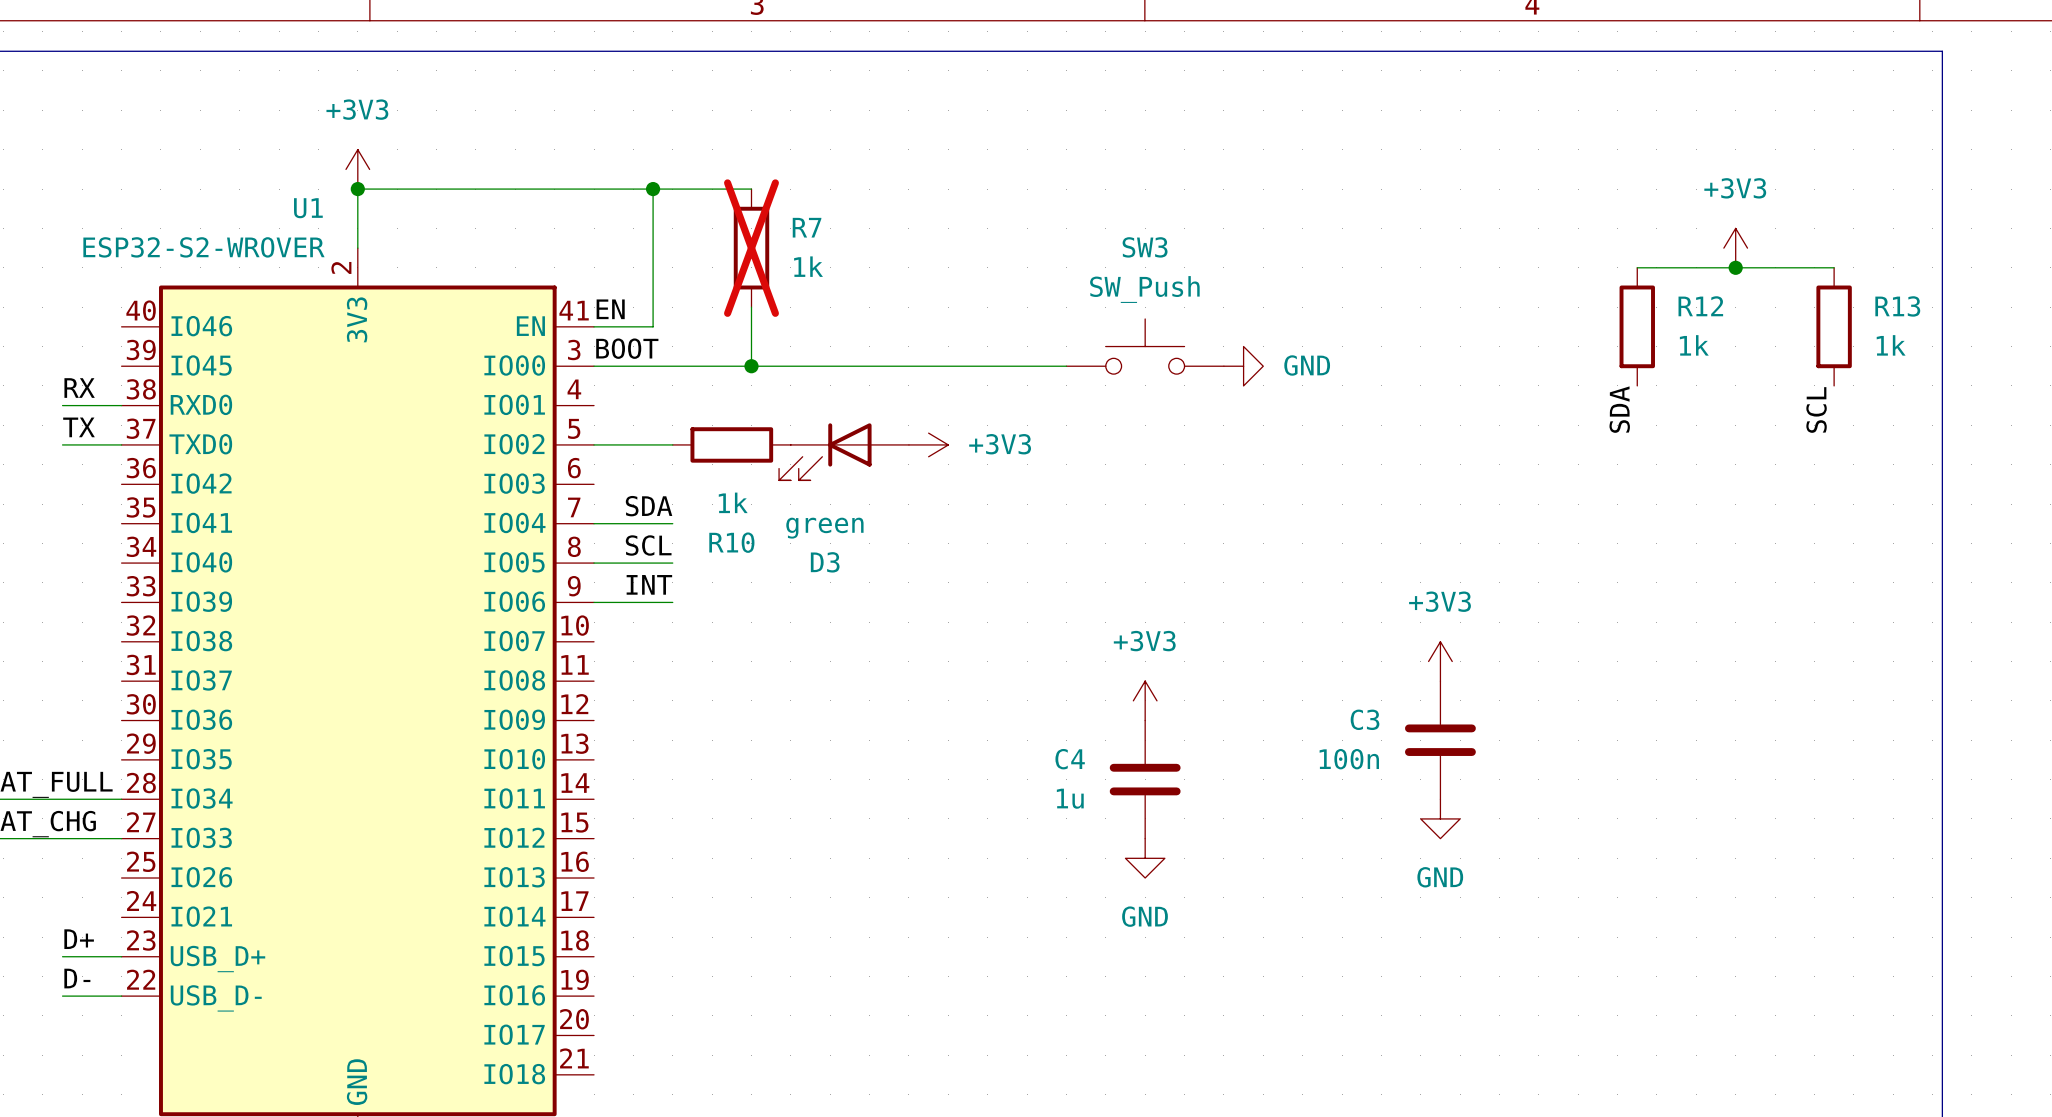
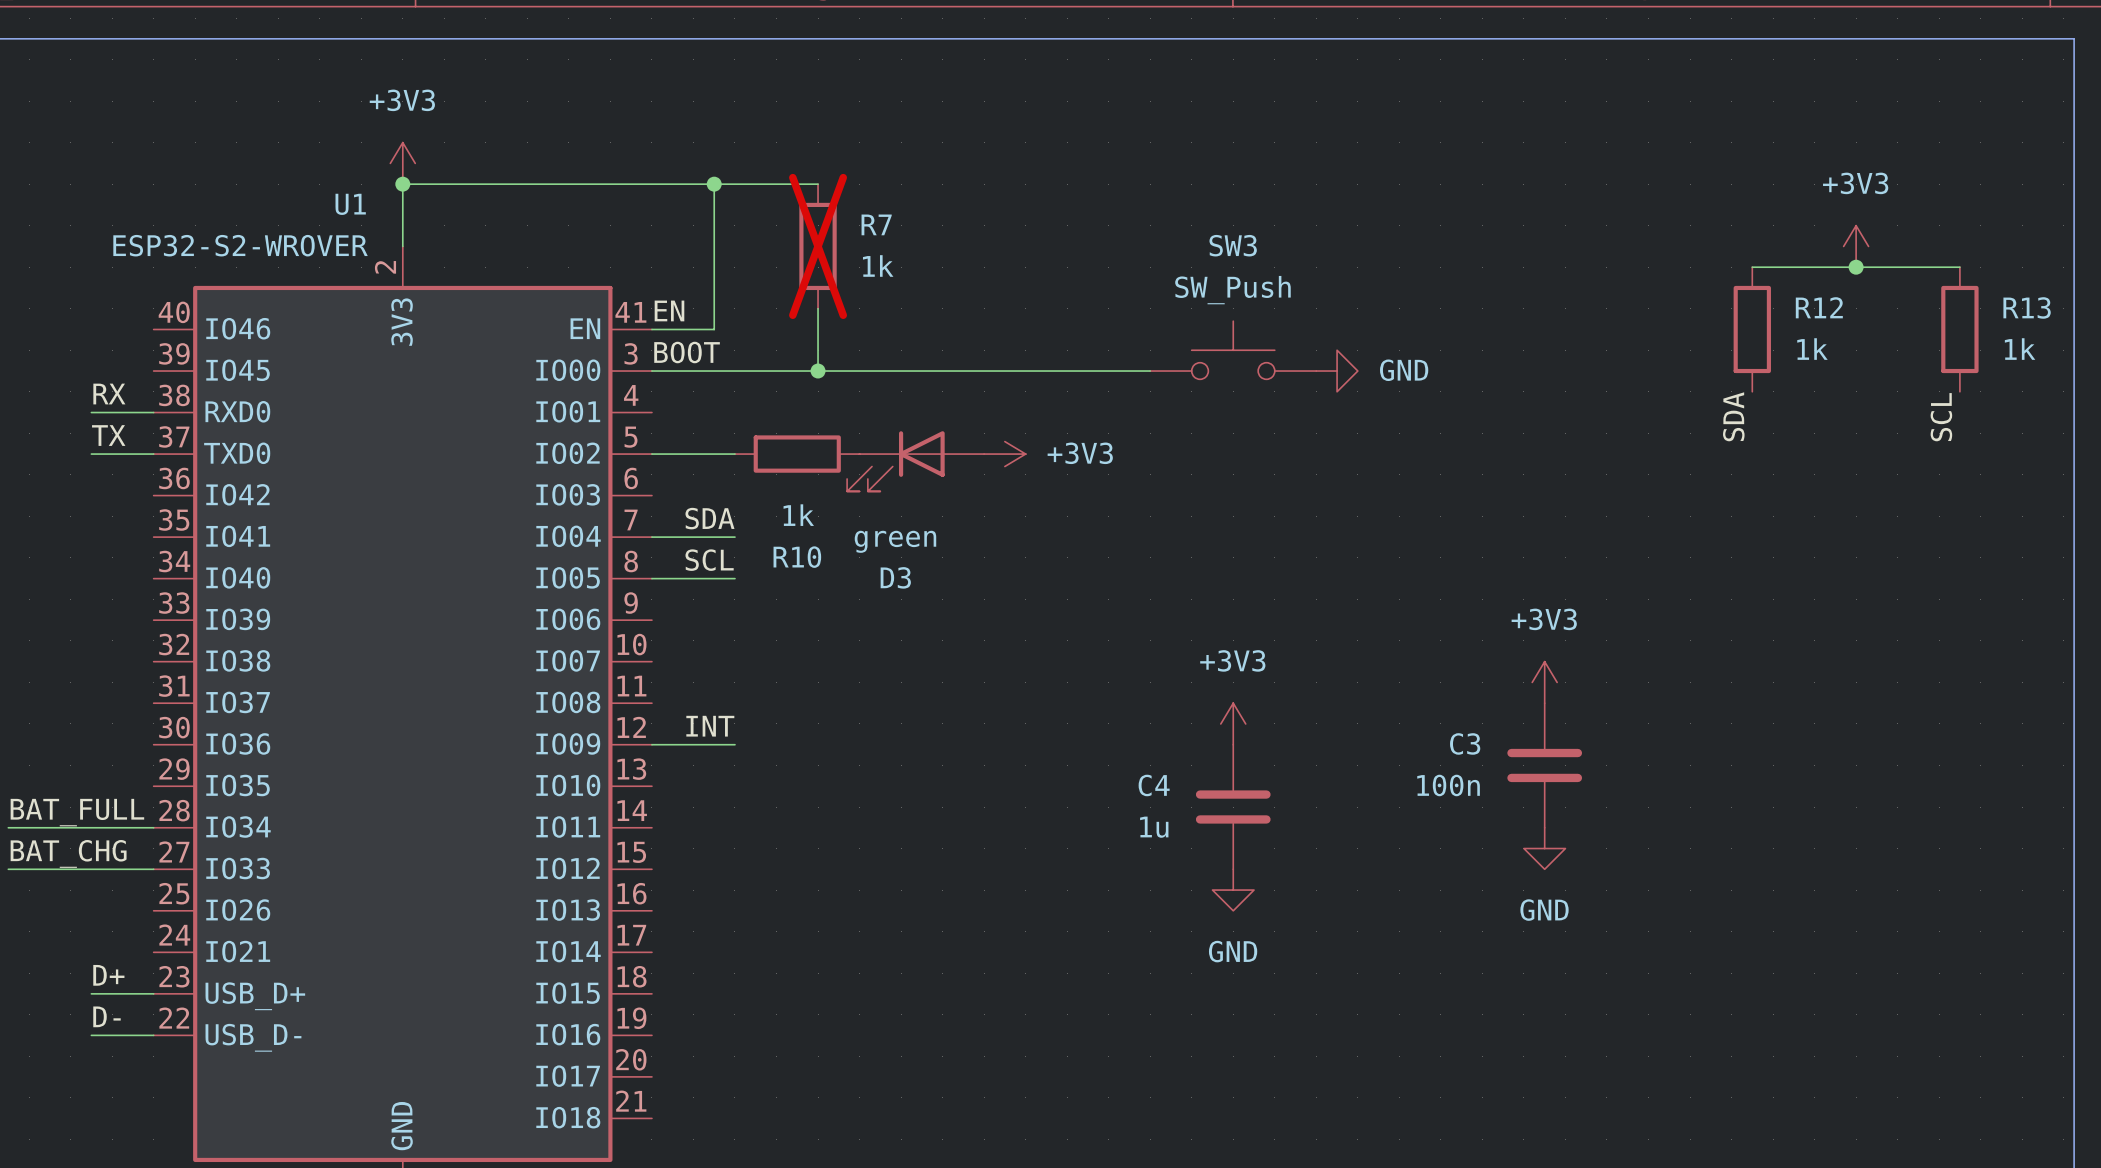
label position: INT (649, 584) -> INT (710, 726)
wire: (594, 602) (672, 602) -> (651, 744) (734, 744)

